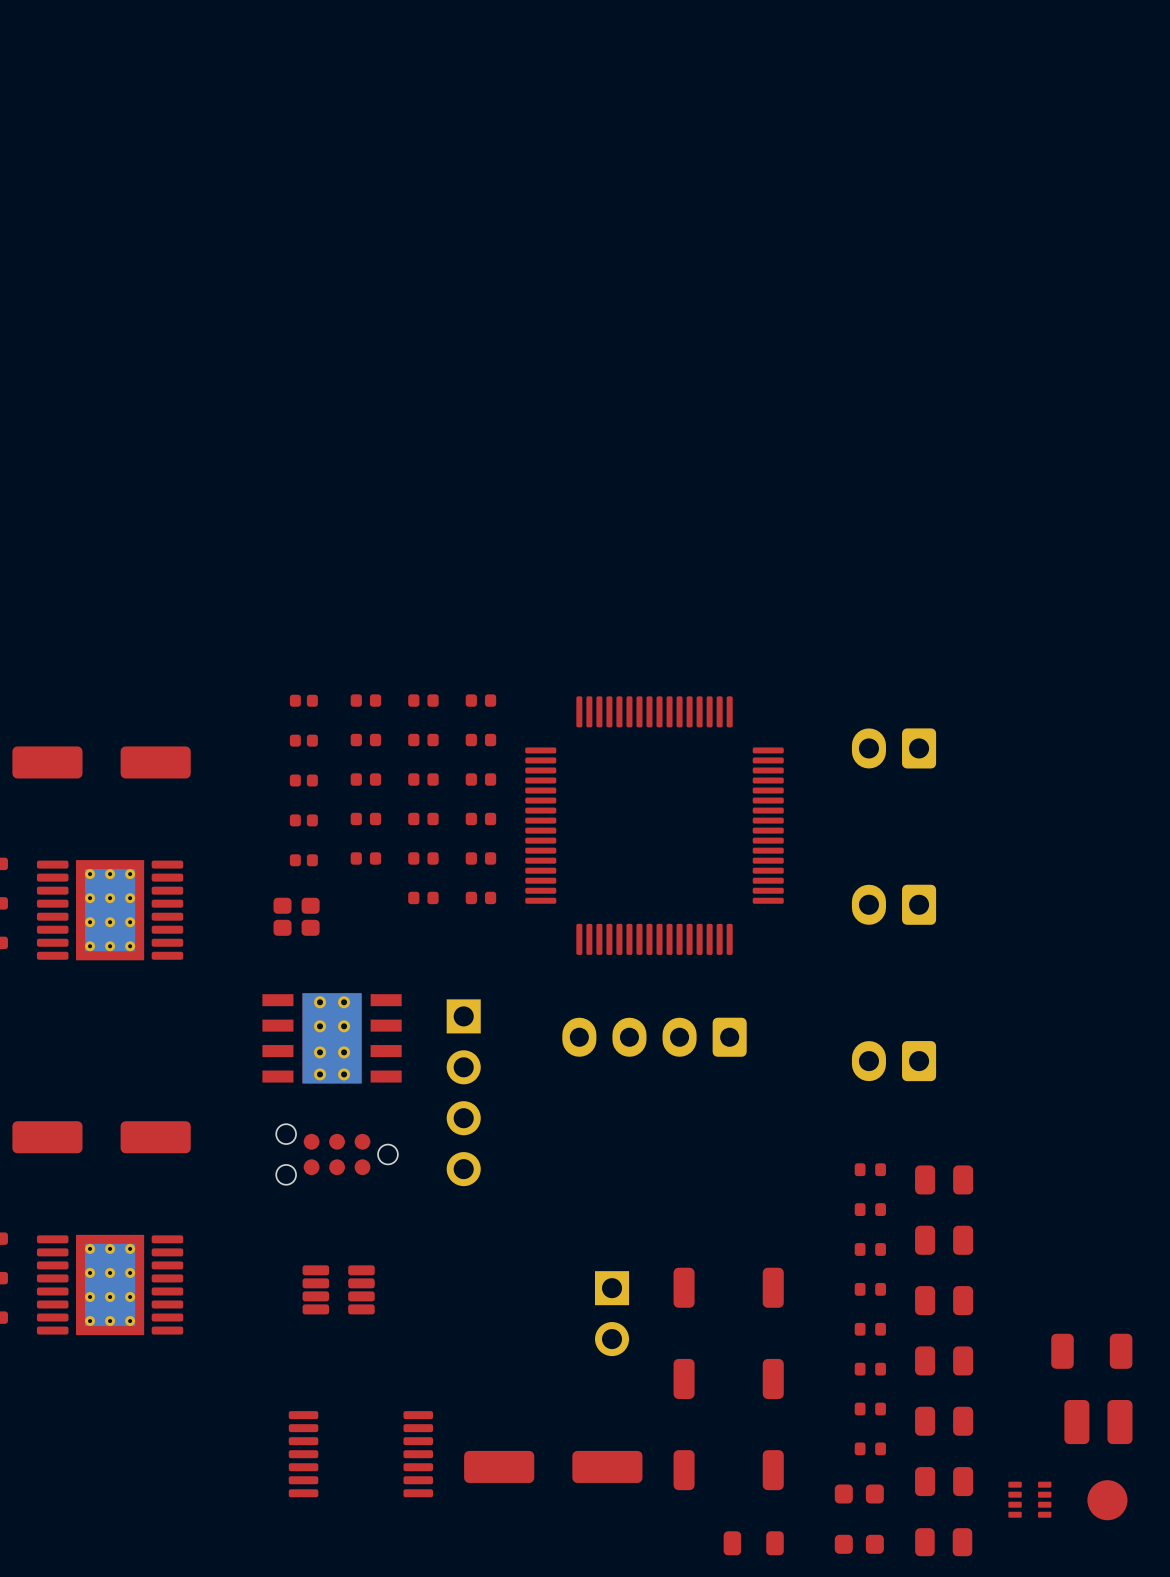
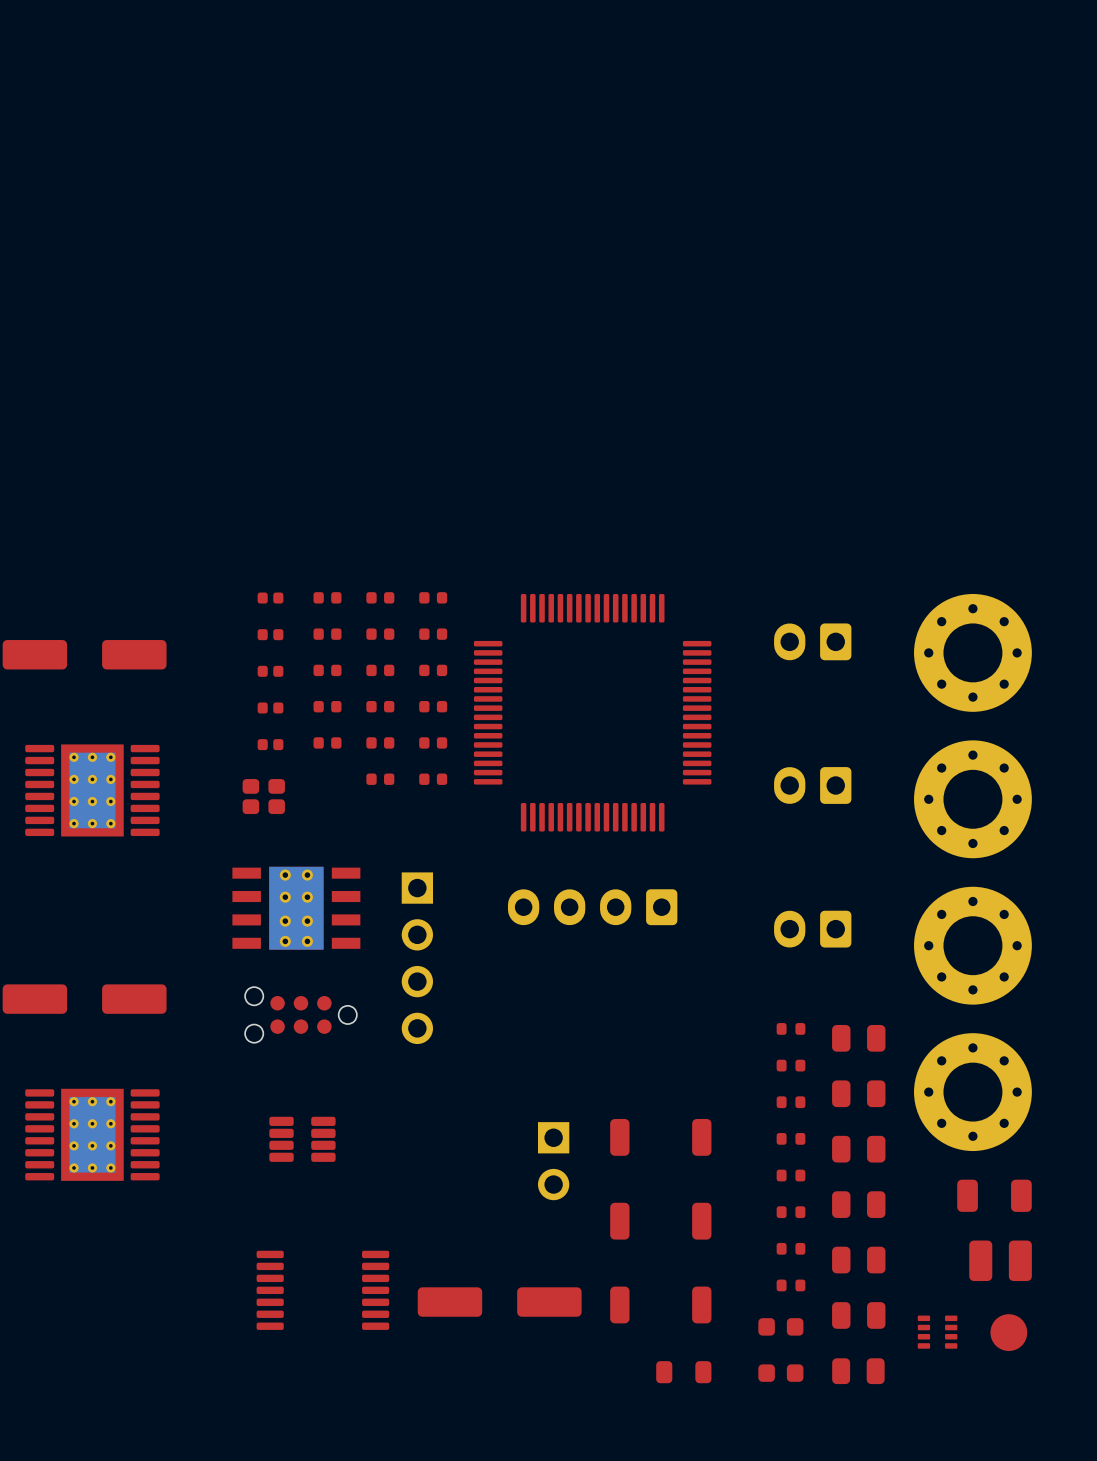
part: none -> (972, 652)
part: none -> (972, 799)
part: none -> (972, 945)
part: none -> (972, 1092)

